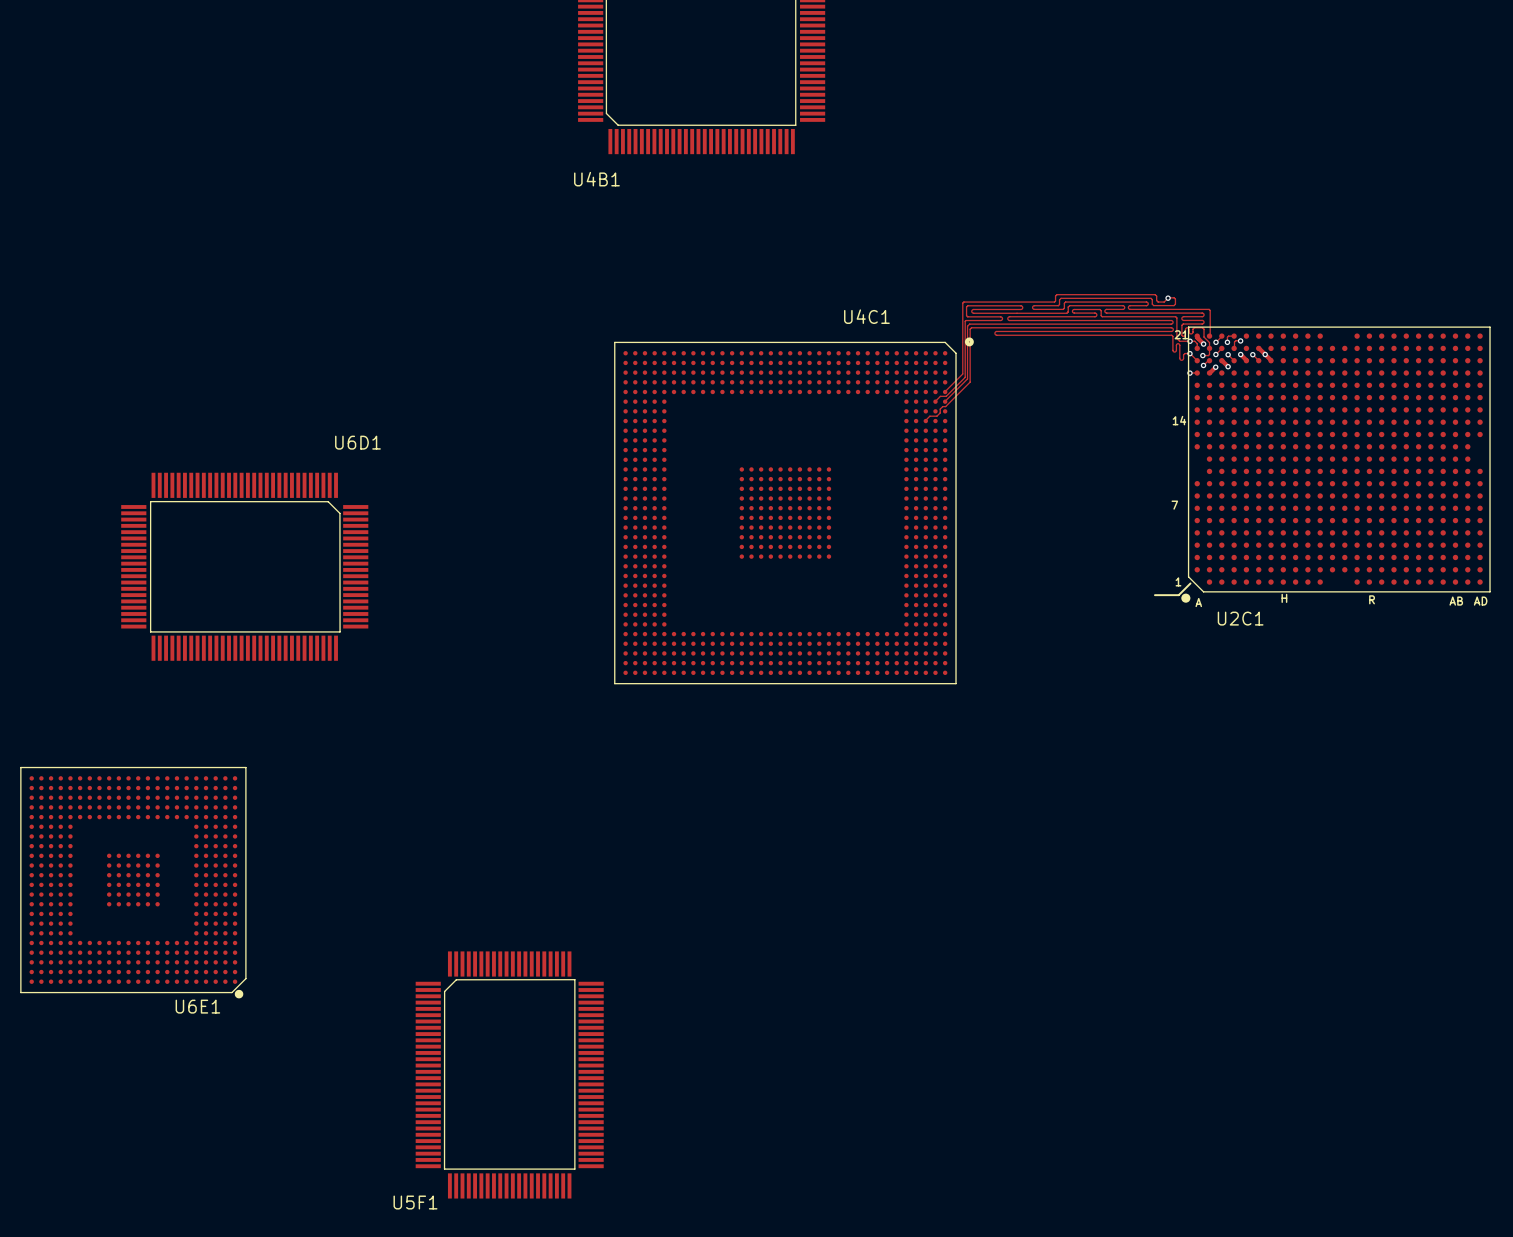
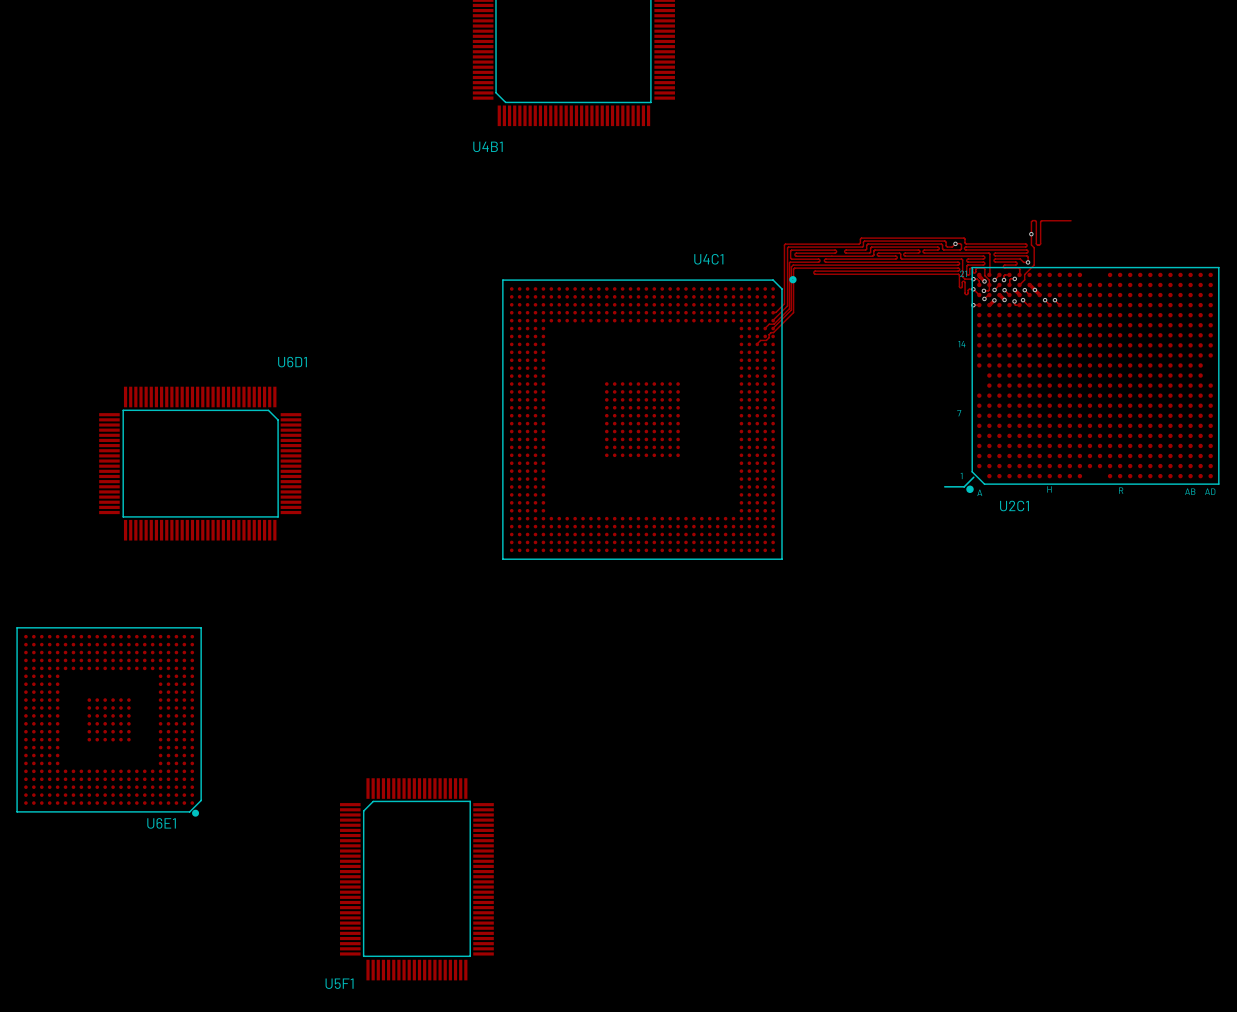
track: none -> (1071, 220) (1041, 221) (1039, 245) (1036, 243) (1036, 221) (1031, 221) (1034, 265) (1024, 274) (1024, 279) (1019, 285)
via: none -> (1031, 234)
track: none -> (1028, 262) (1027, 255) (994, 254) (995, 253) (1026, 253) (1026, 250) (964, 248) (965, 246) (1025, 246) (1026, 244) (966, 243) (964, 238) (861, 238) (859, 244) (785, 244) (784, 303) (775, 312) (773, 312)
track: none -> (1028, 262) (1023, 262) (1020, 259) (994, 259) (995, 262) (1016, 262) (1016, 264) (1004, 265) (1003, 266) (1018, 268) (1019, 274)
via: none -> (1028, 262)
track: none -> (1023, 300) (1029, 305)
via: none -> (1023, 300)
via: none -> (1045, 300)
track: none -> (1054, 300) (1059, 305)
via: none -> (1054, 300)
track: none -> (1045, 300) (1049, 305)
track: none -> (1014, 301) (1015, 305) (1019, 305)
via: none -> (1014, 301)

